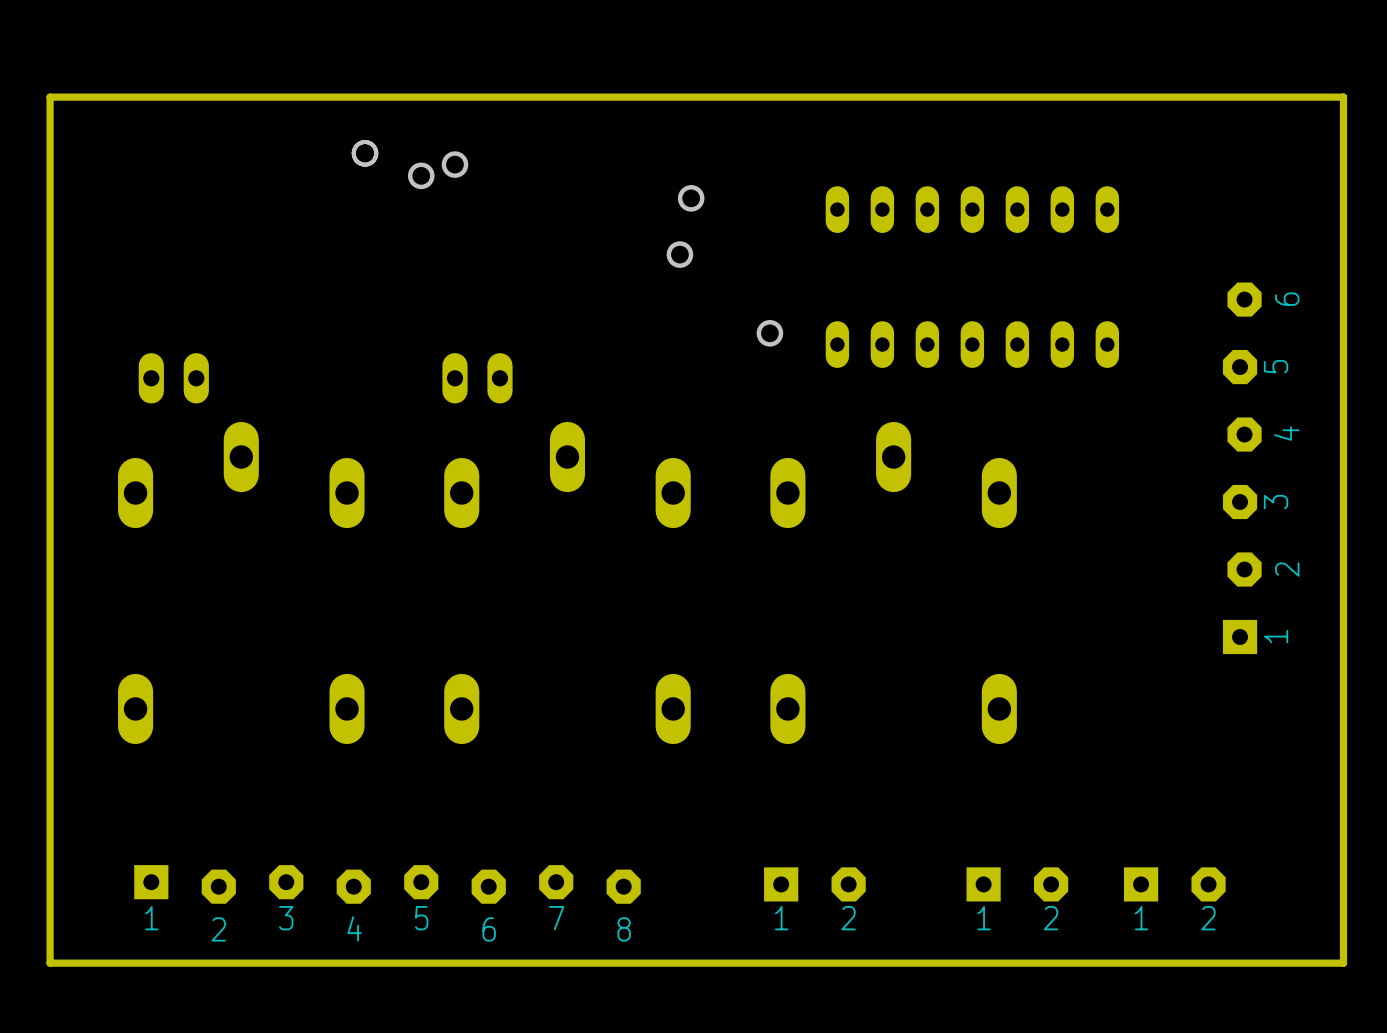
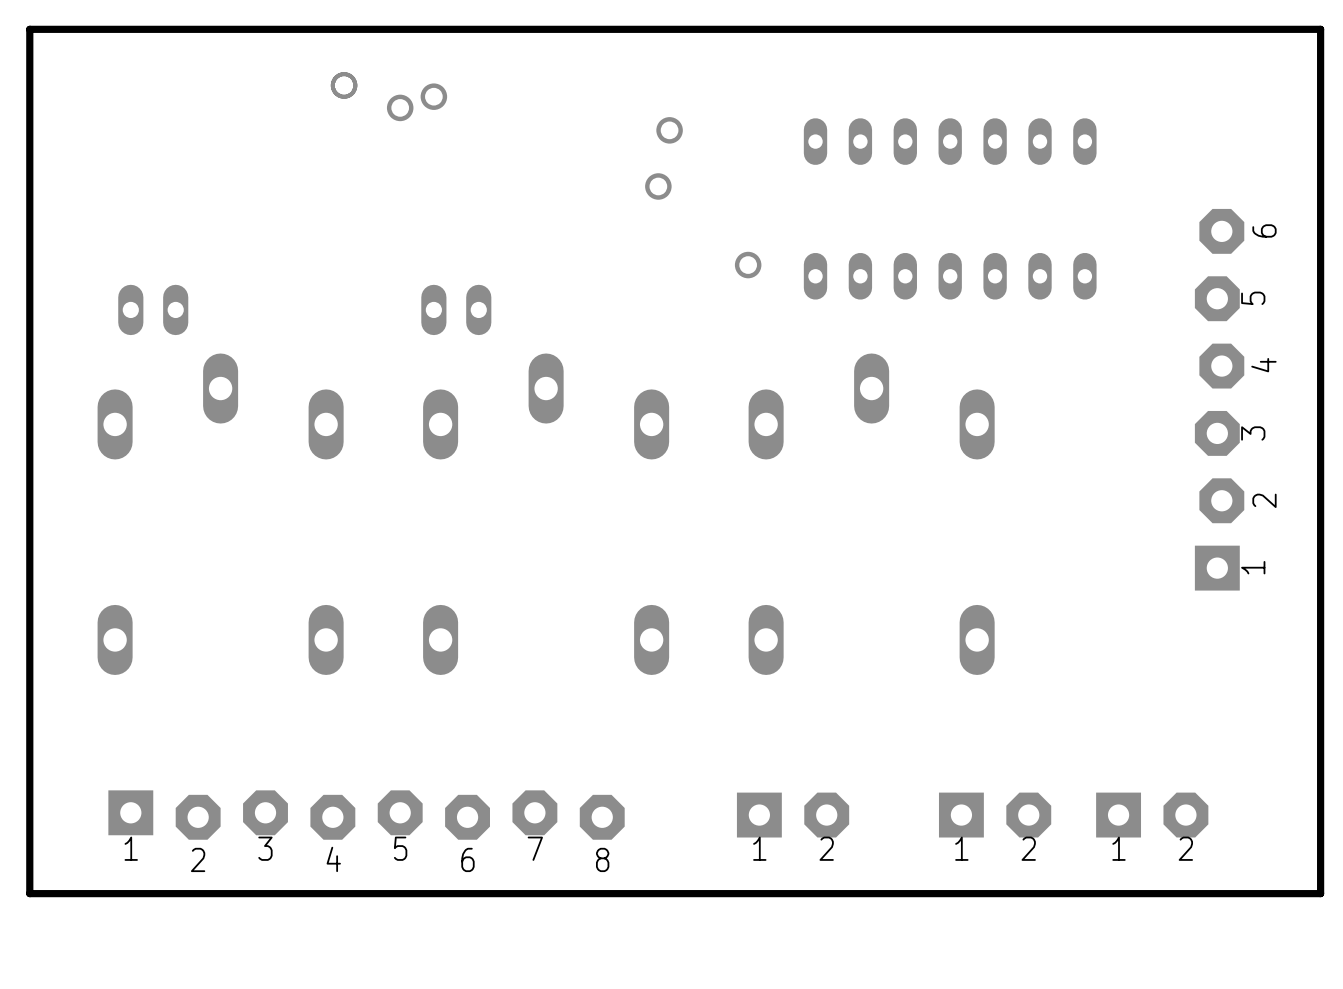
part footprint: [1222, 282, 1262, 655] -> [1194, 208, 1245, 591]
part footprint: [134, 865, 641, 904] -> [108, 790, 625, 840]
part footprint: [764, 867, 866, 902] -> [736, 792, 850, 838]
part footprint: [966, 867, 1069, 902] -> [938, 792, 1052, 838]
part footprint: [1123, 867, 1226, 902] -> [1096, 792, 1209, 838]

